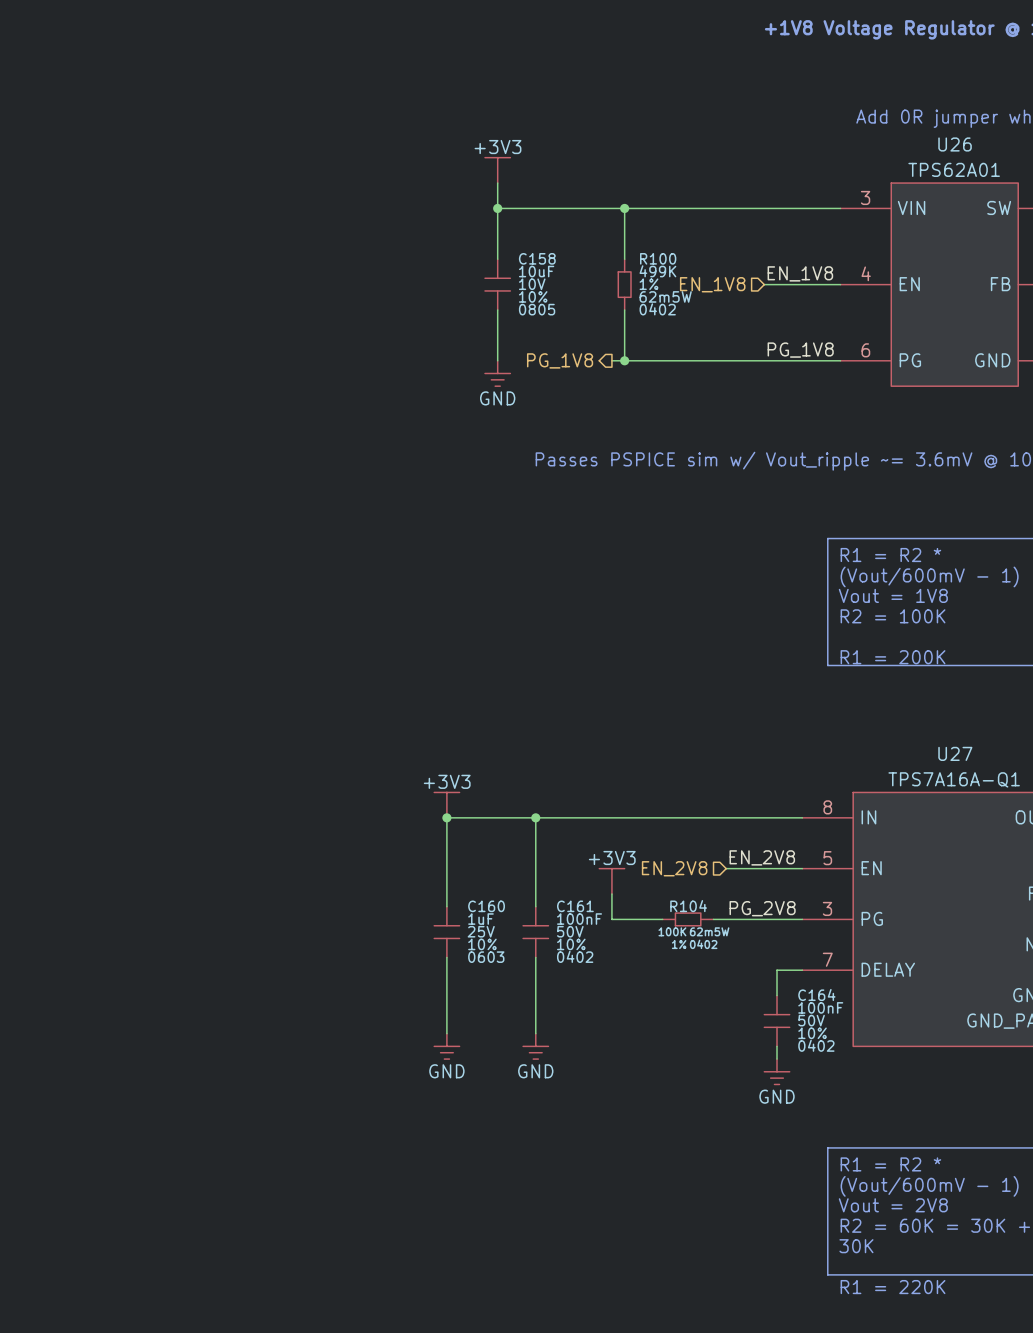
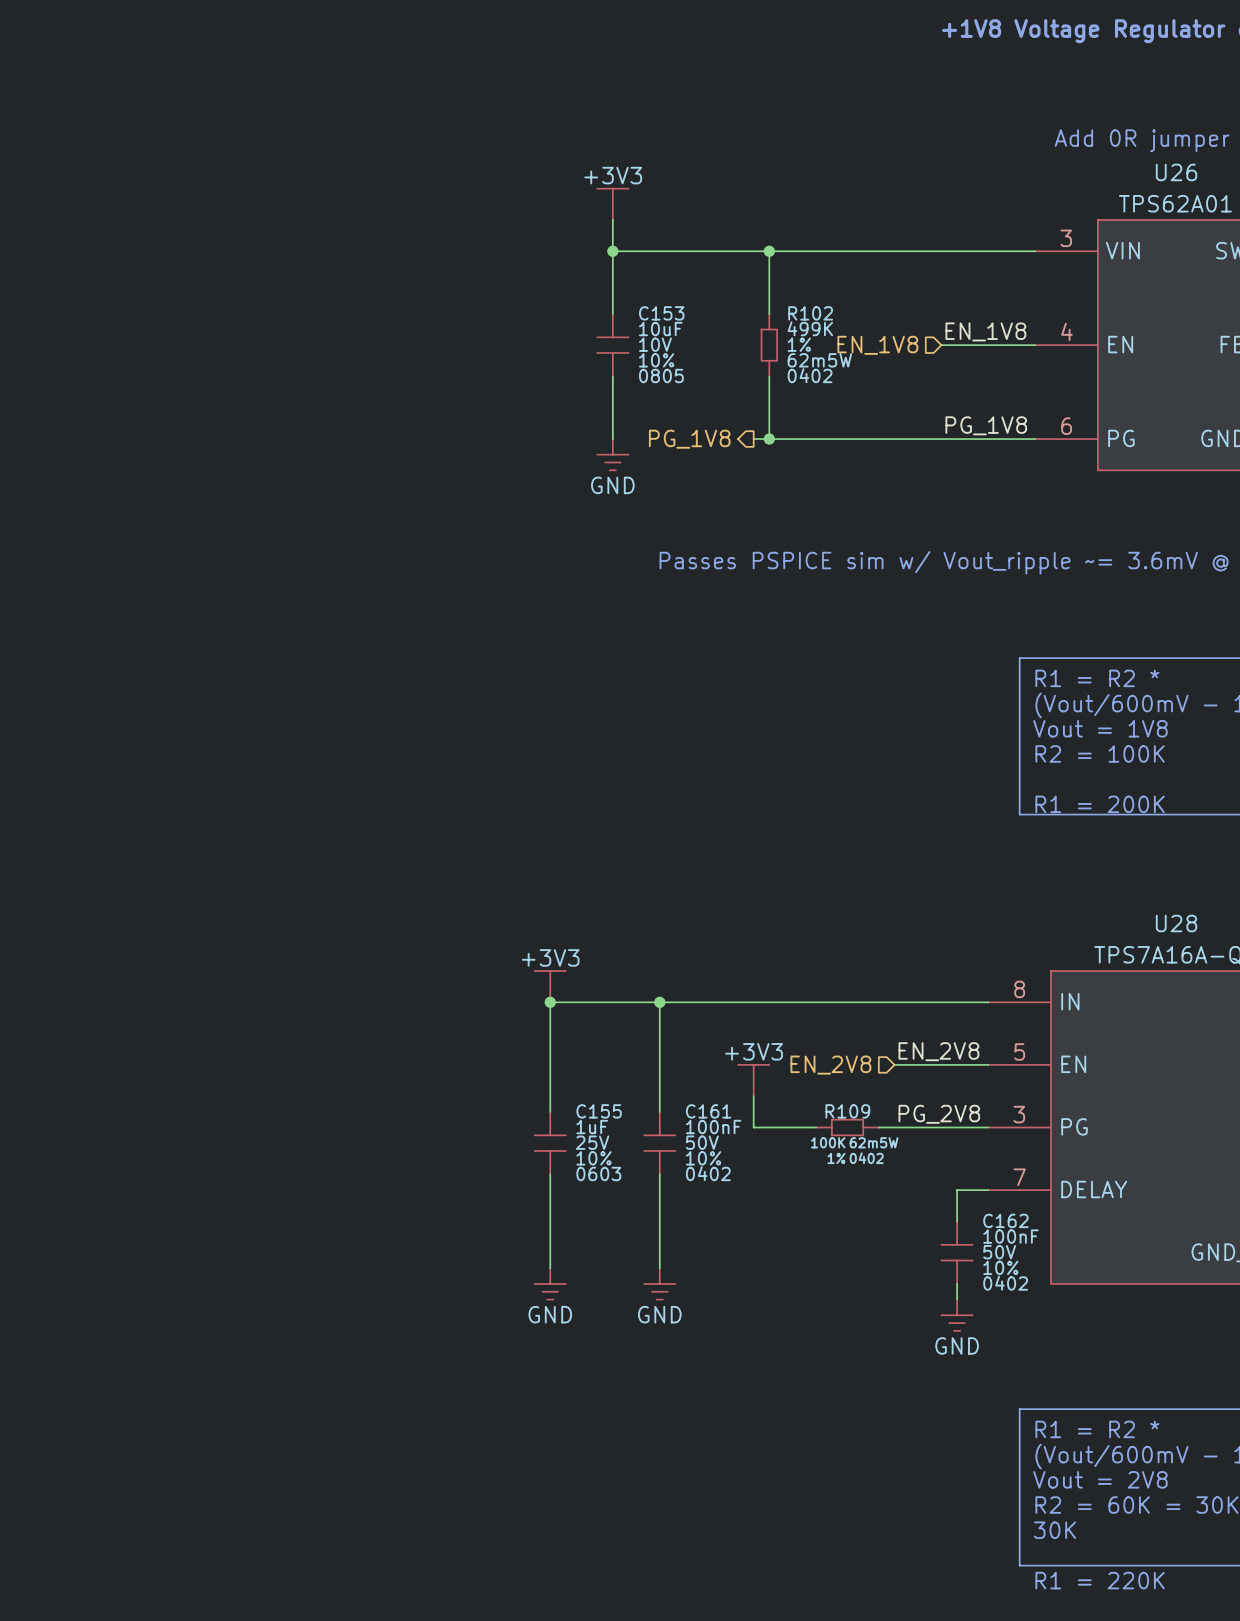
C158 name: C158 (537, 258) -> C153 (661, 313)
R100 name: R100 (658, 258) -> R102 (810, 313)
U27 name: U27 (955, 753) -> U28 (1176, 923)
C160 name: C160 (486, 906) -> C155 (599, 1111)
R104 name: R104 (688, 906) -> R109 (847, 1111)
C164 name: C164 (816, 994) -> C162 (1005, 1220)

